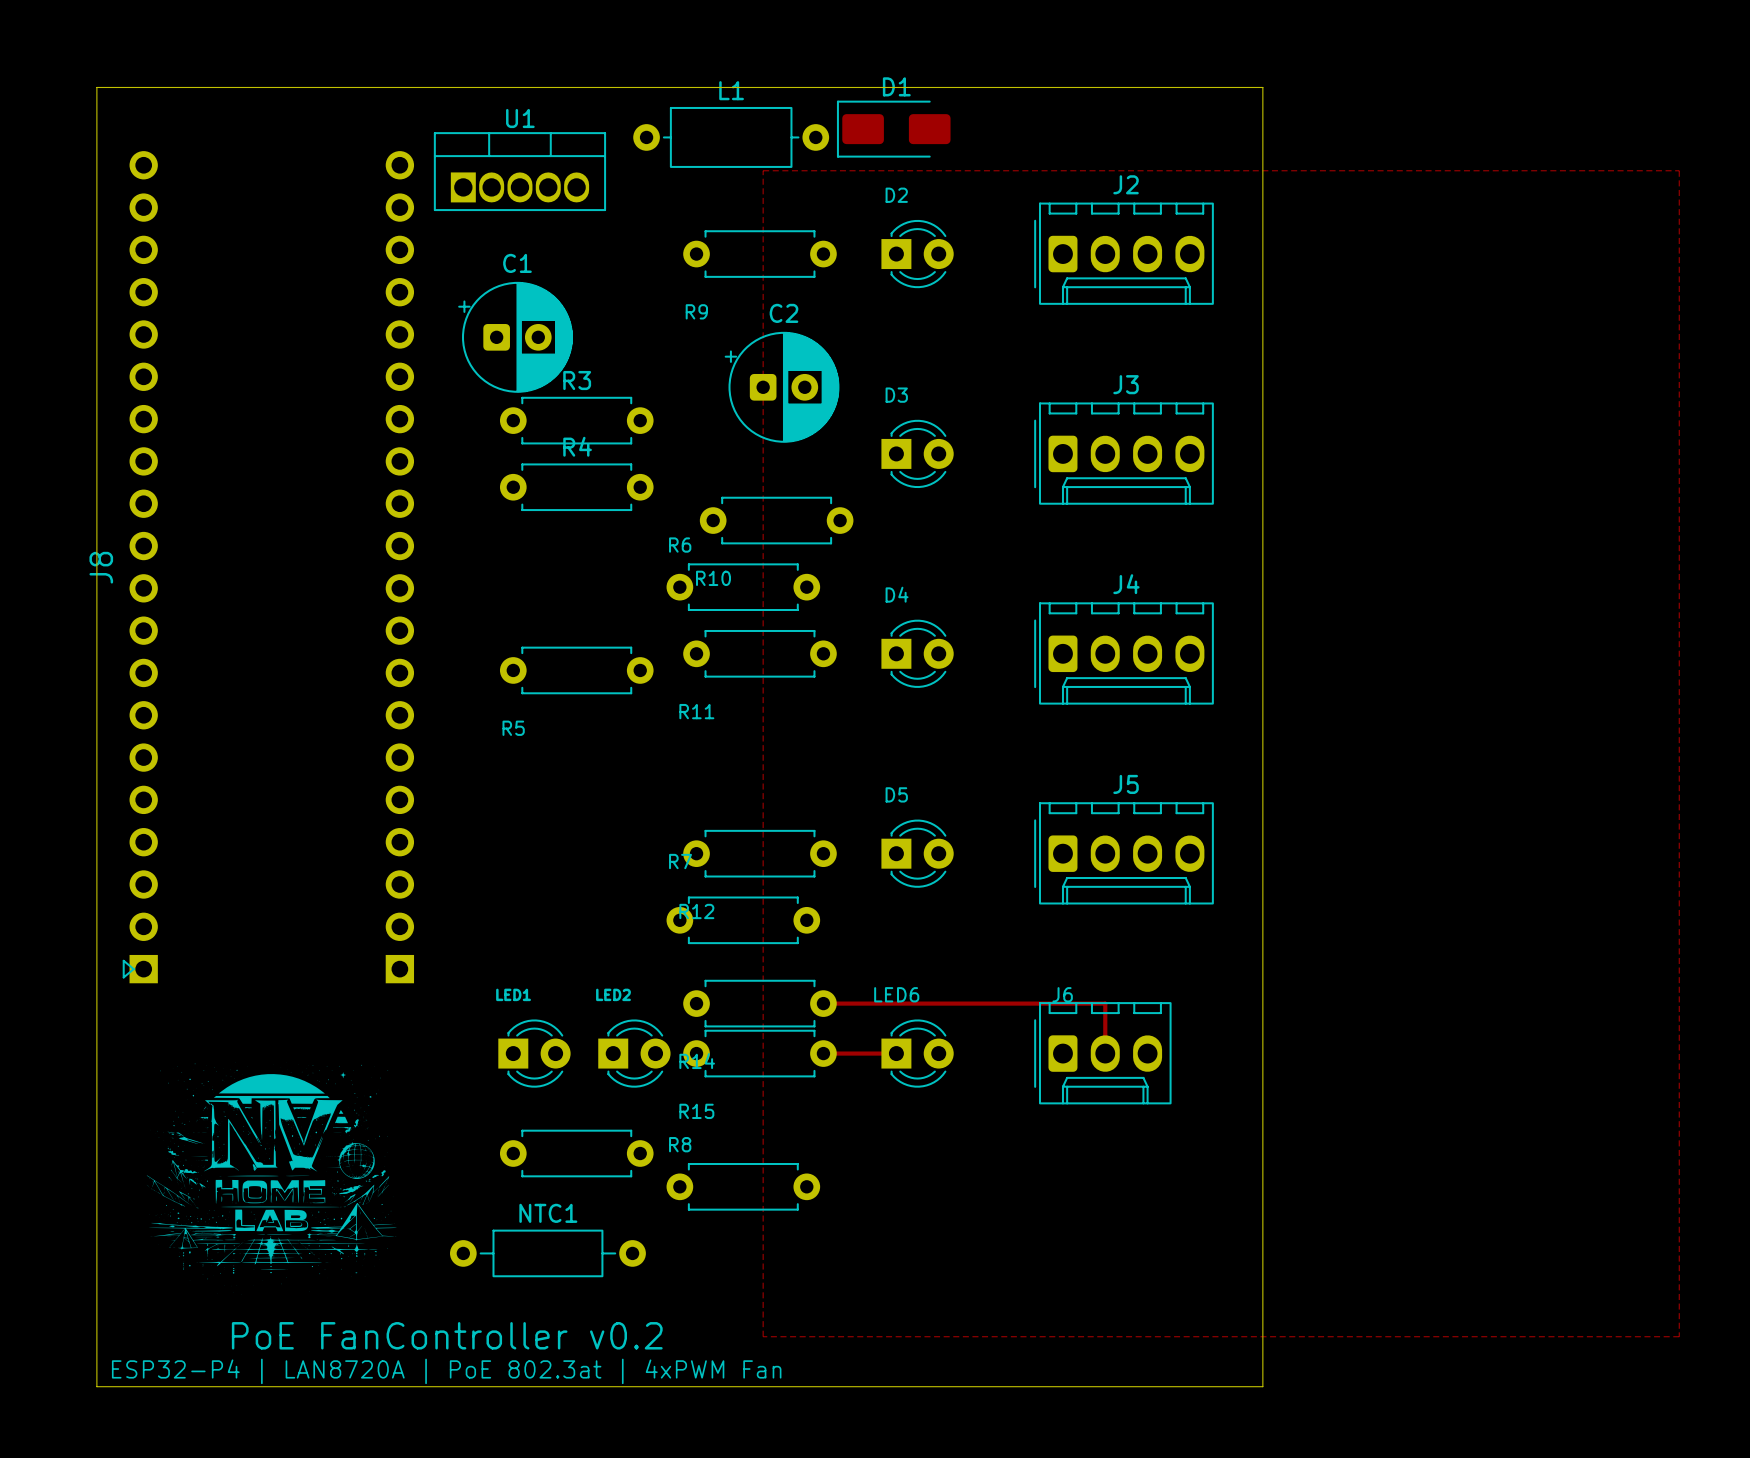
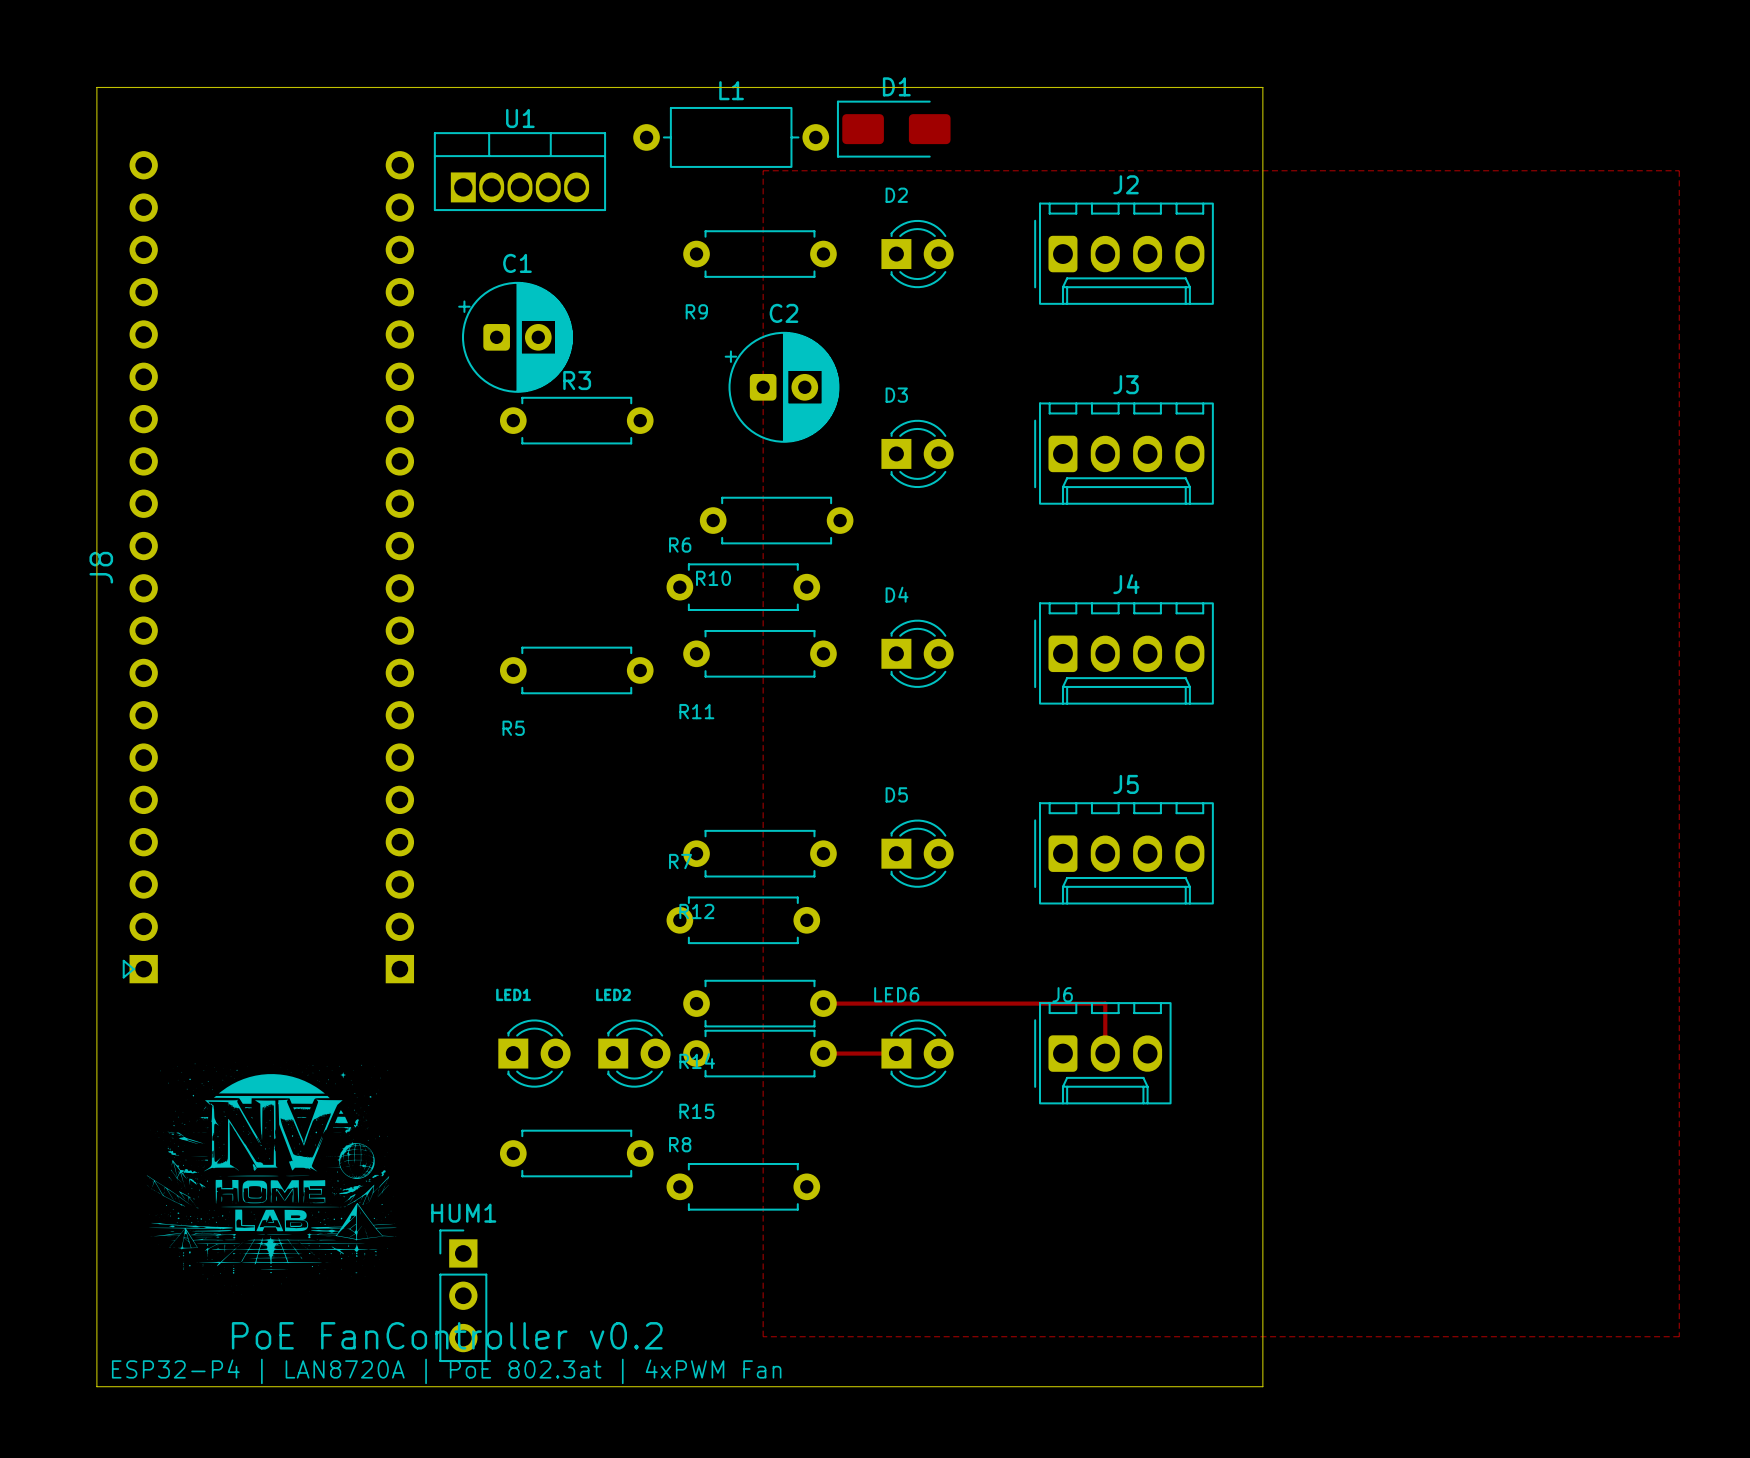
R4: (576, 487) -> none
NTC1: (547, 1253) -> none
HUM1: none -> (463, 1295)

